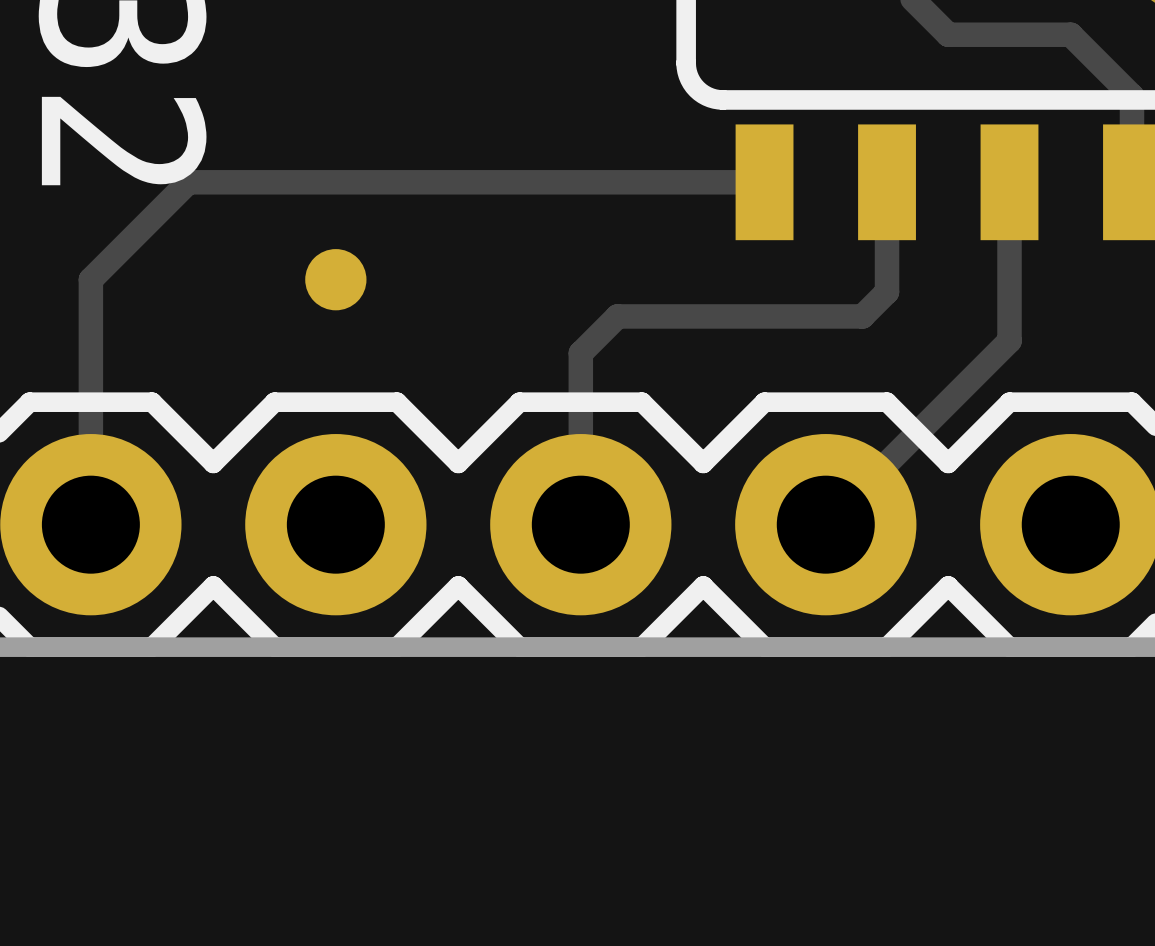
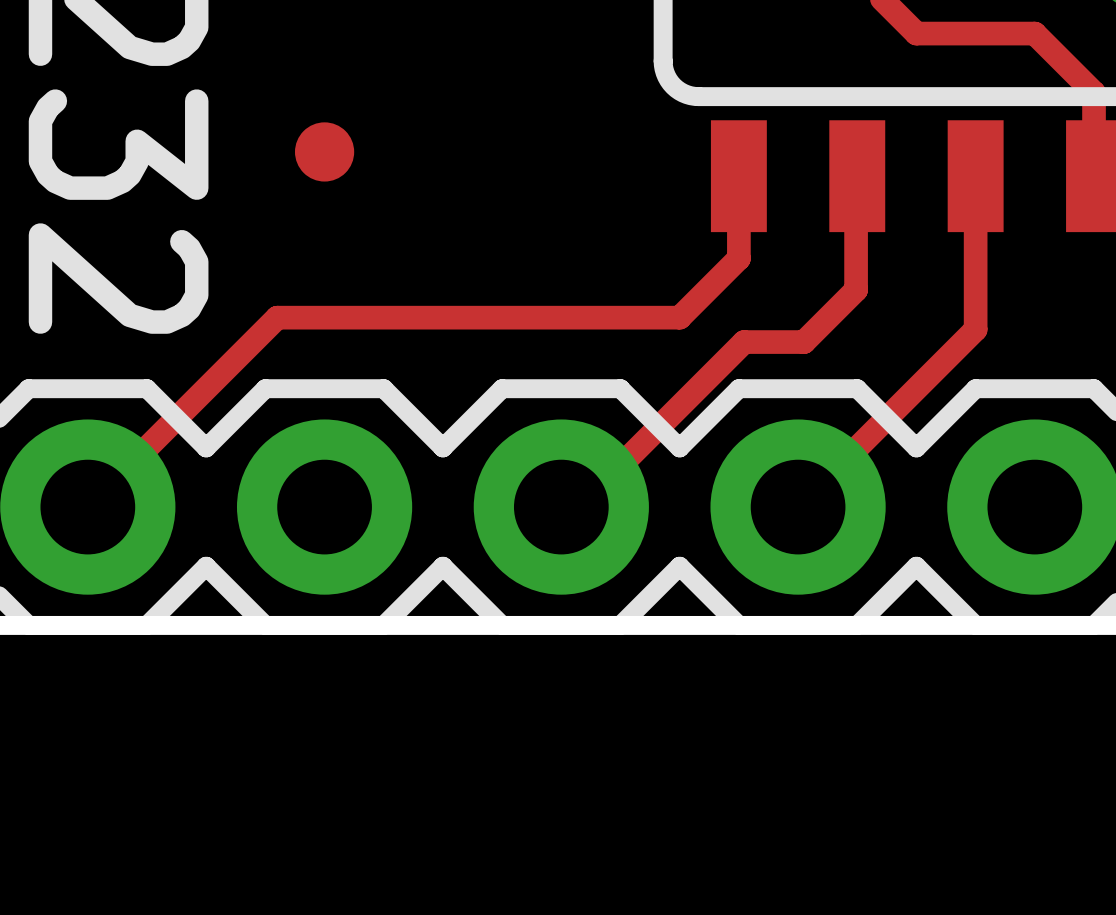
track: (764, 182) (188, 182) (90, 279) (90, 524) -> (738, 176) (738, 258) (679, 317) (277, 317) (87, 507)
track: (887, 182) (887, 291) (862, 316) (617, 316) (580, 353) (580, 524) -> (856, 177) (856, 289) (804, 342) (744, 342) (579, 507) (561, 507)
part position: (335, 279) -> (324, 151)

